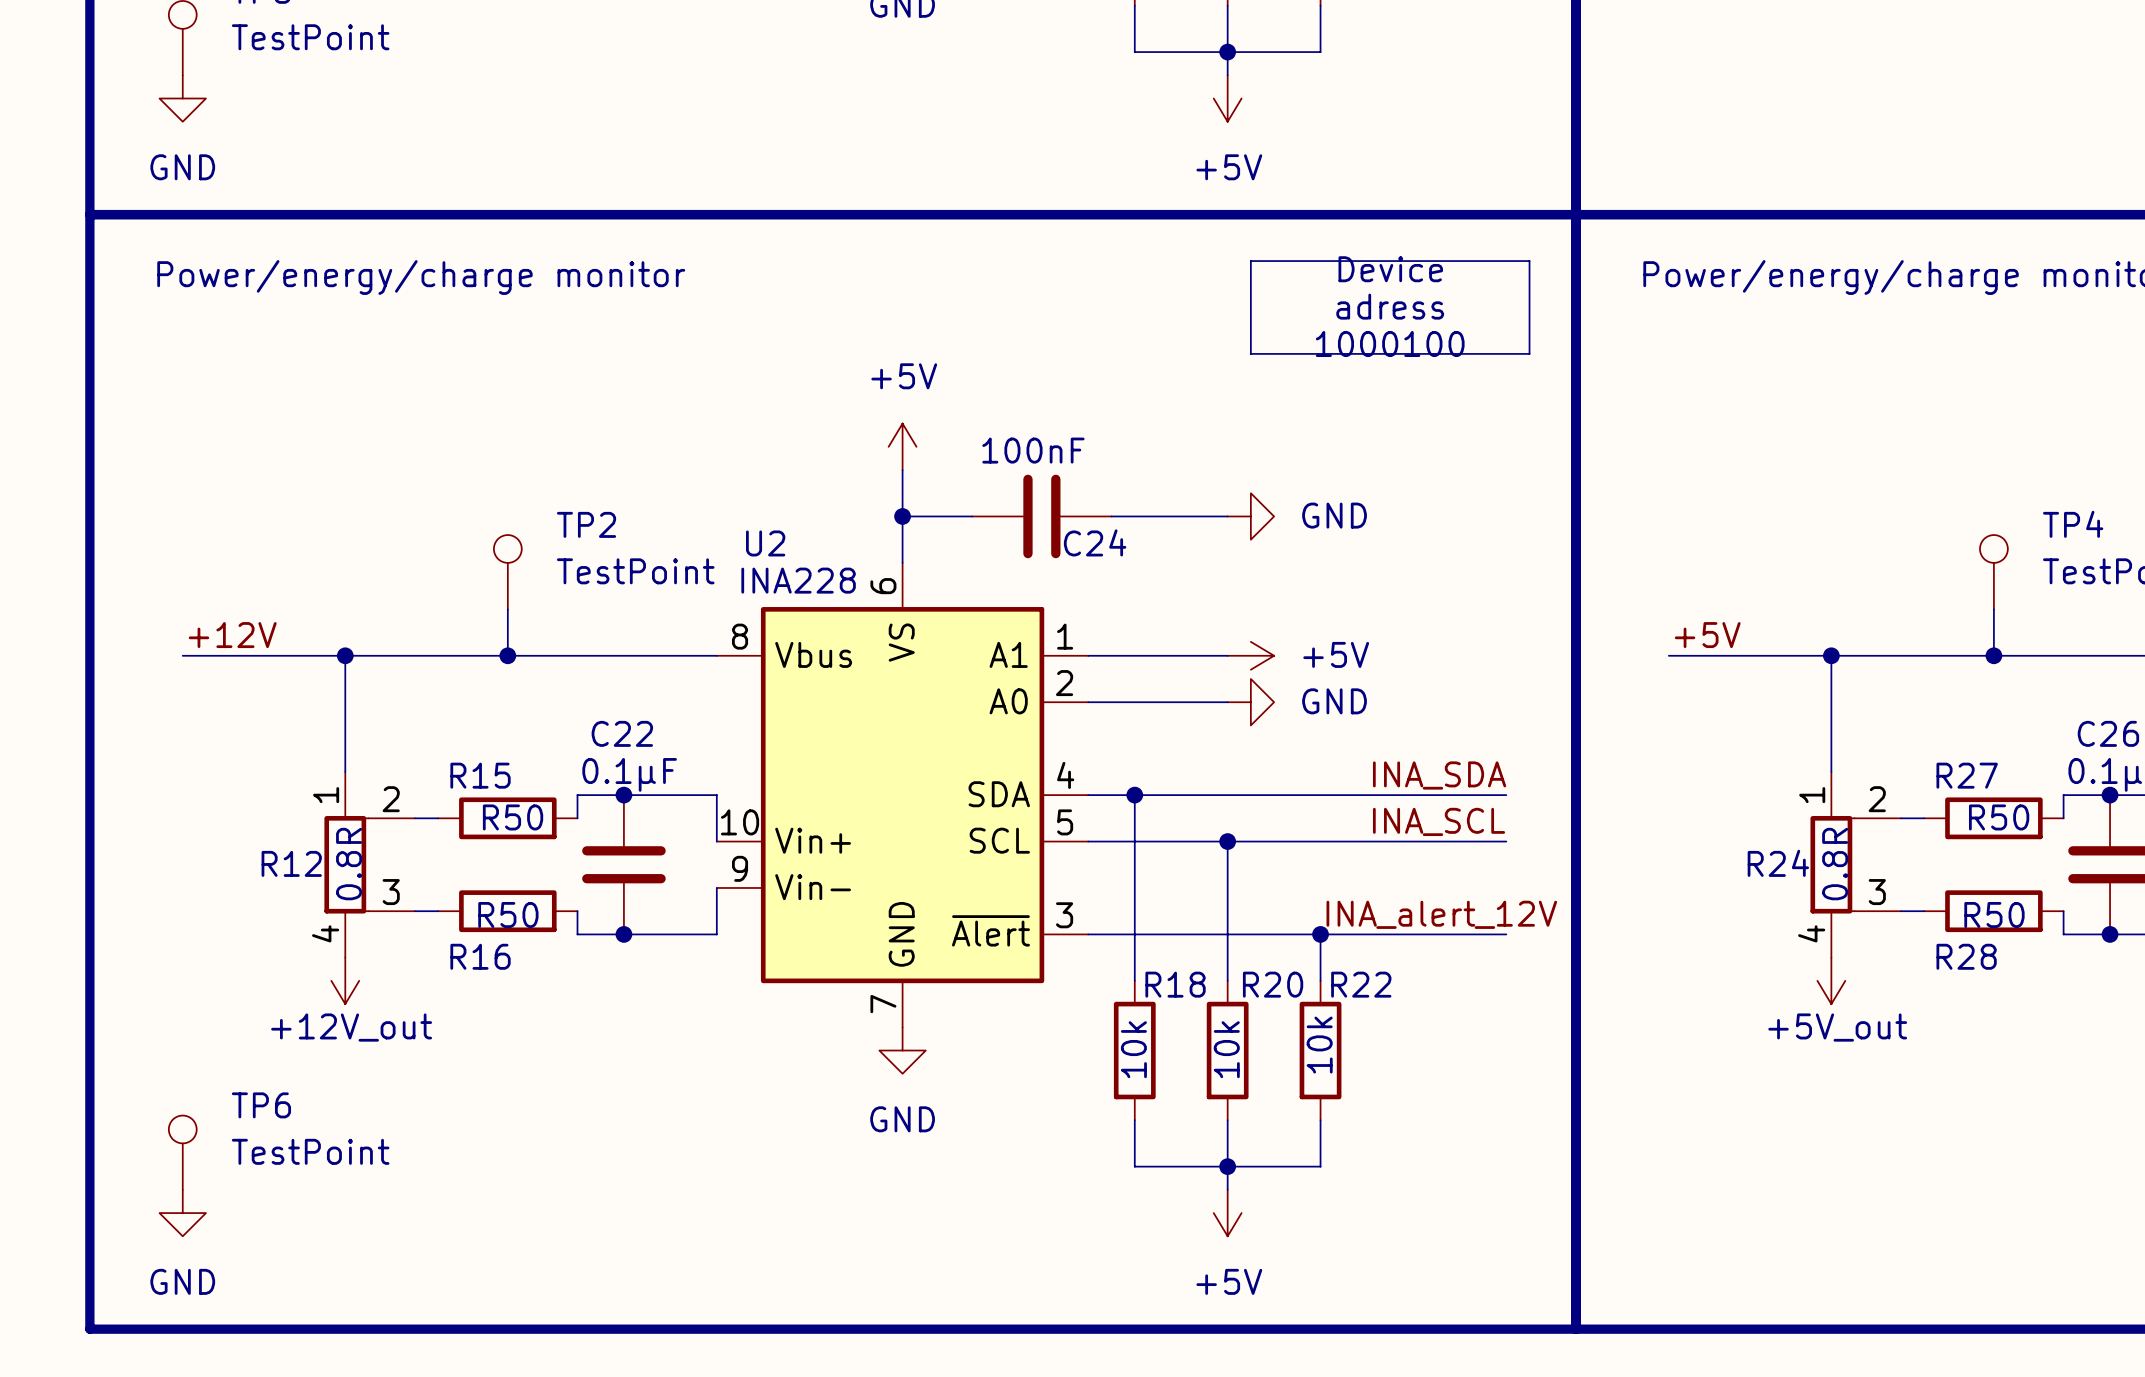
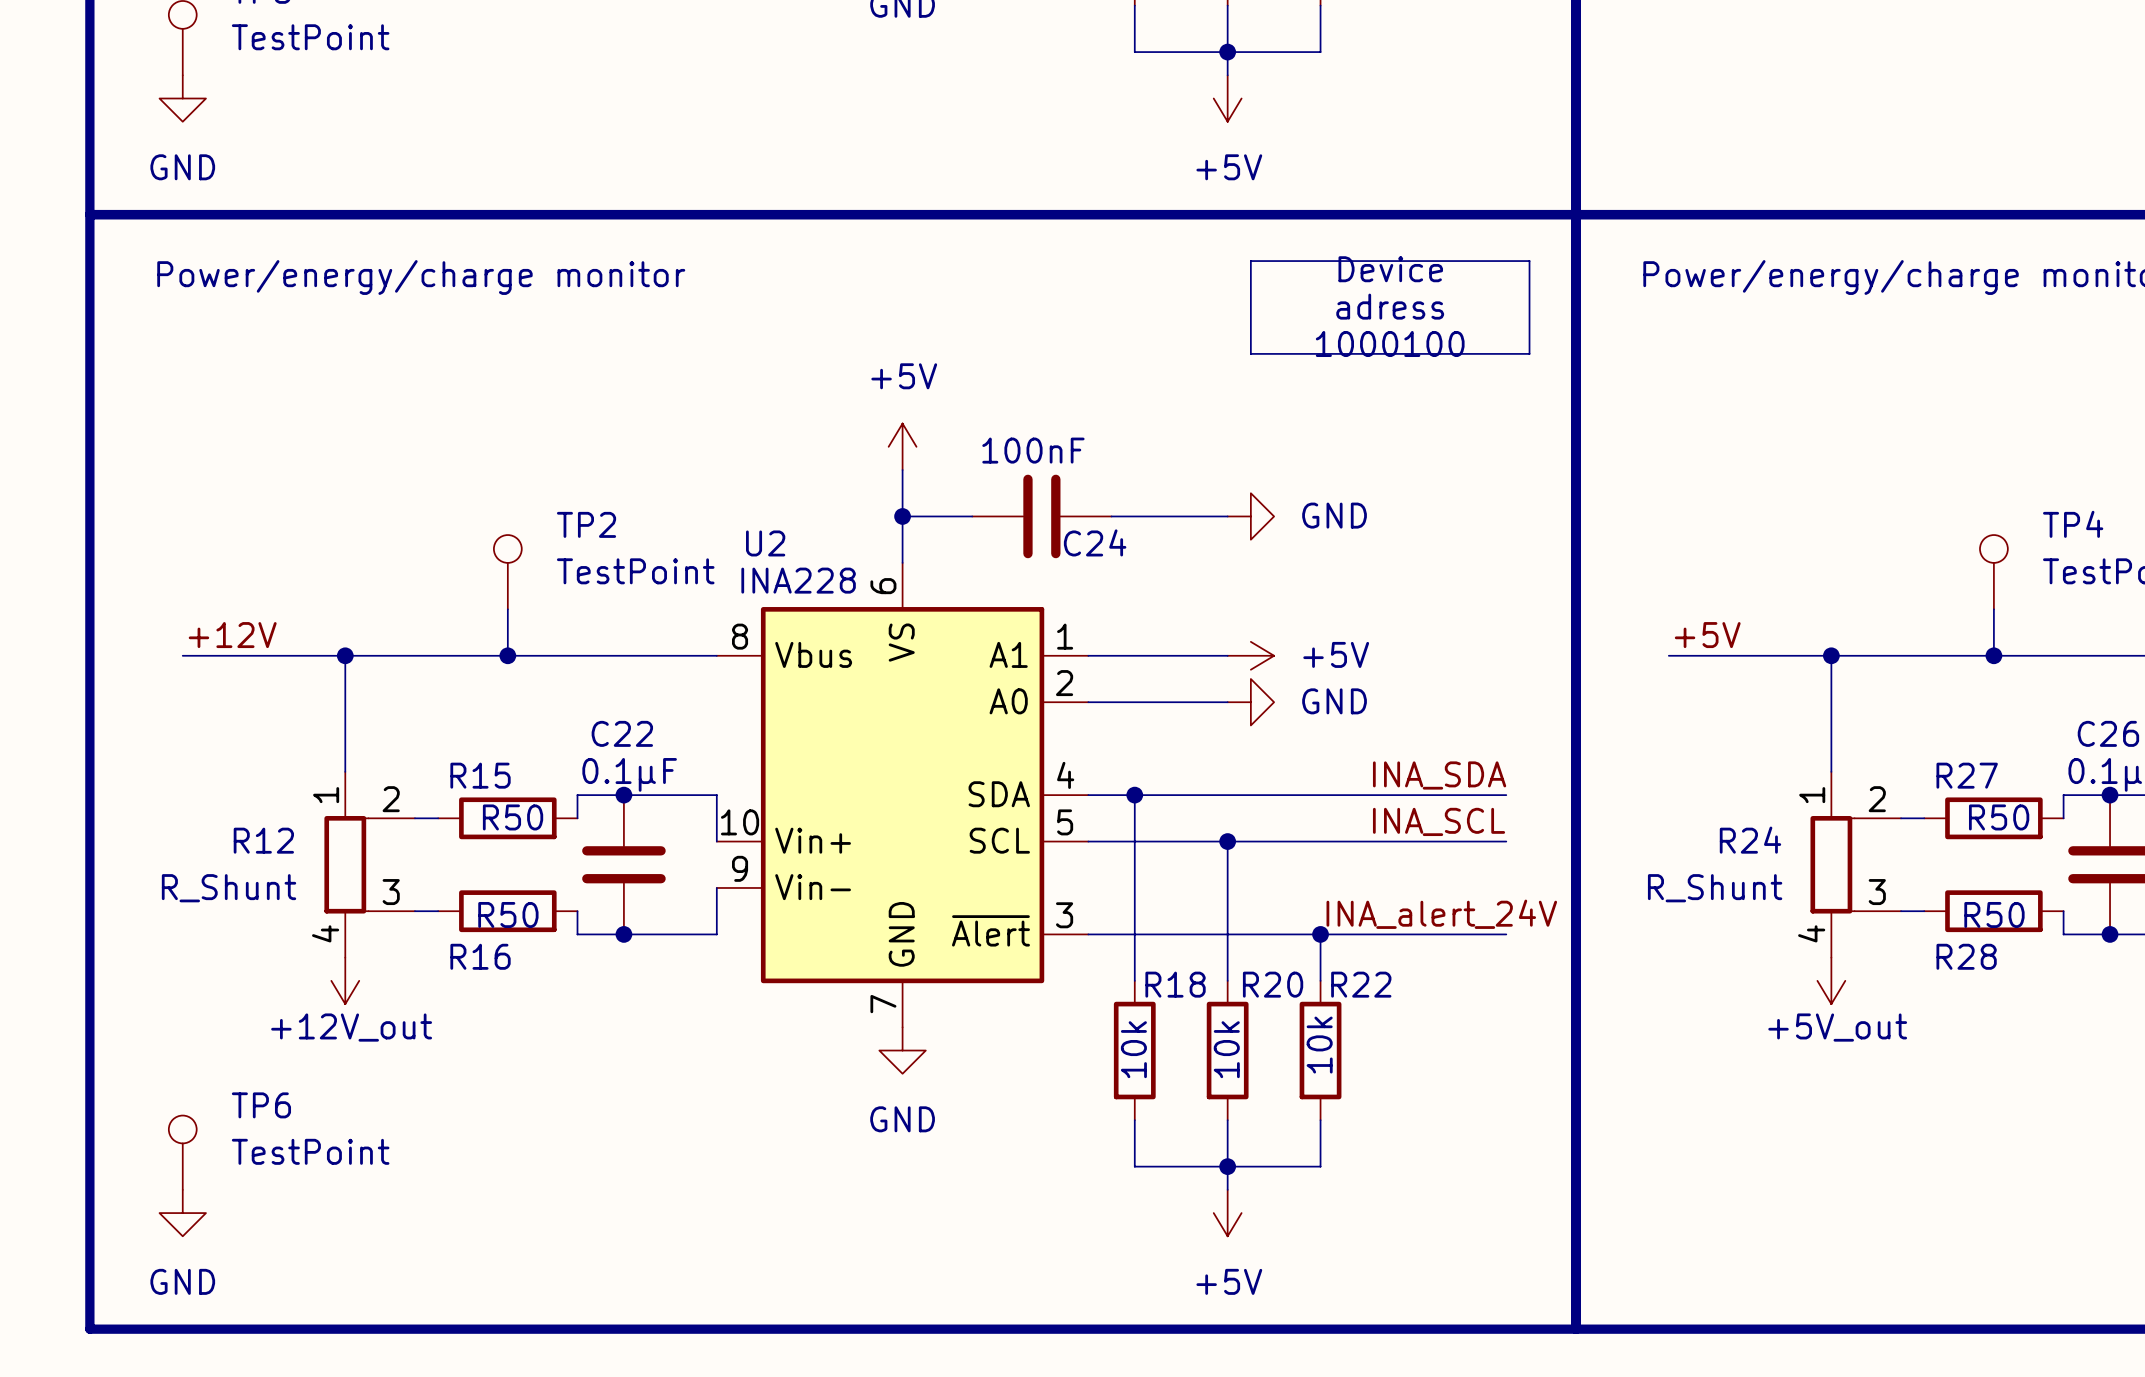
R12 name position: R12 (291, 863) -> R12 (263, 840)
R24 name position: R24 (1778, 863) -> R24 (1750, 840)
R12 value: 0.8R (349, 864) -> R_Shunt (229, 888)
R24 value: 0.8R (1835, 864) -> R_Shunt (1715, 888)
label: INA_alert_12V (1441, 914) -> INA_alert_24V (1441, 914)

